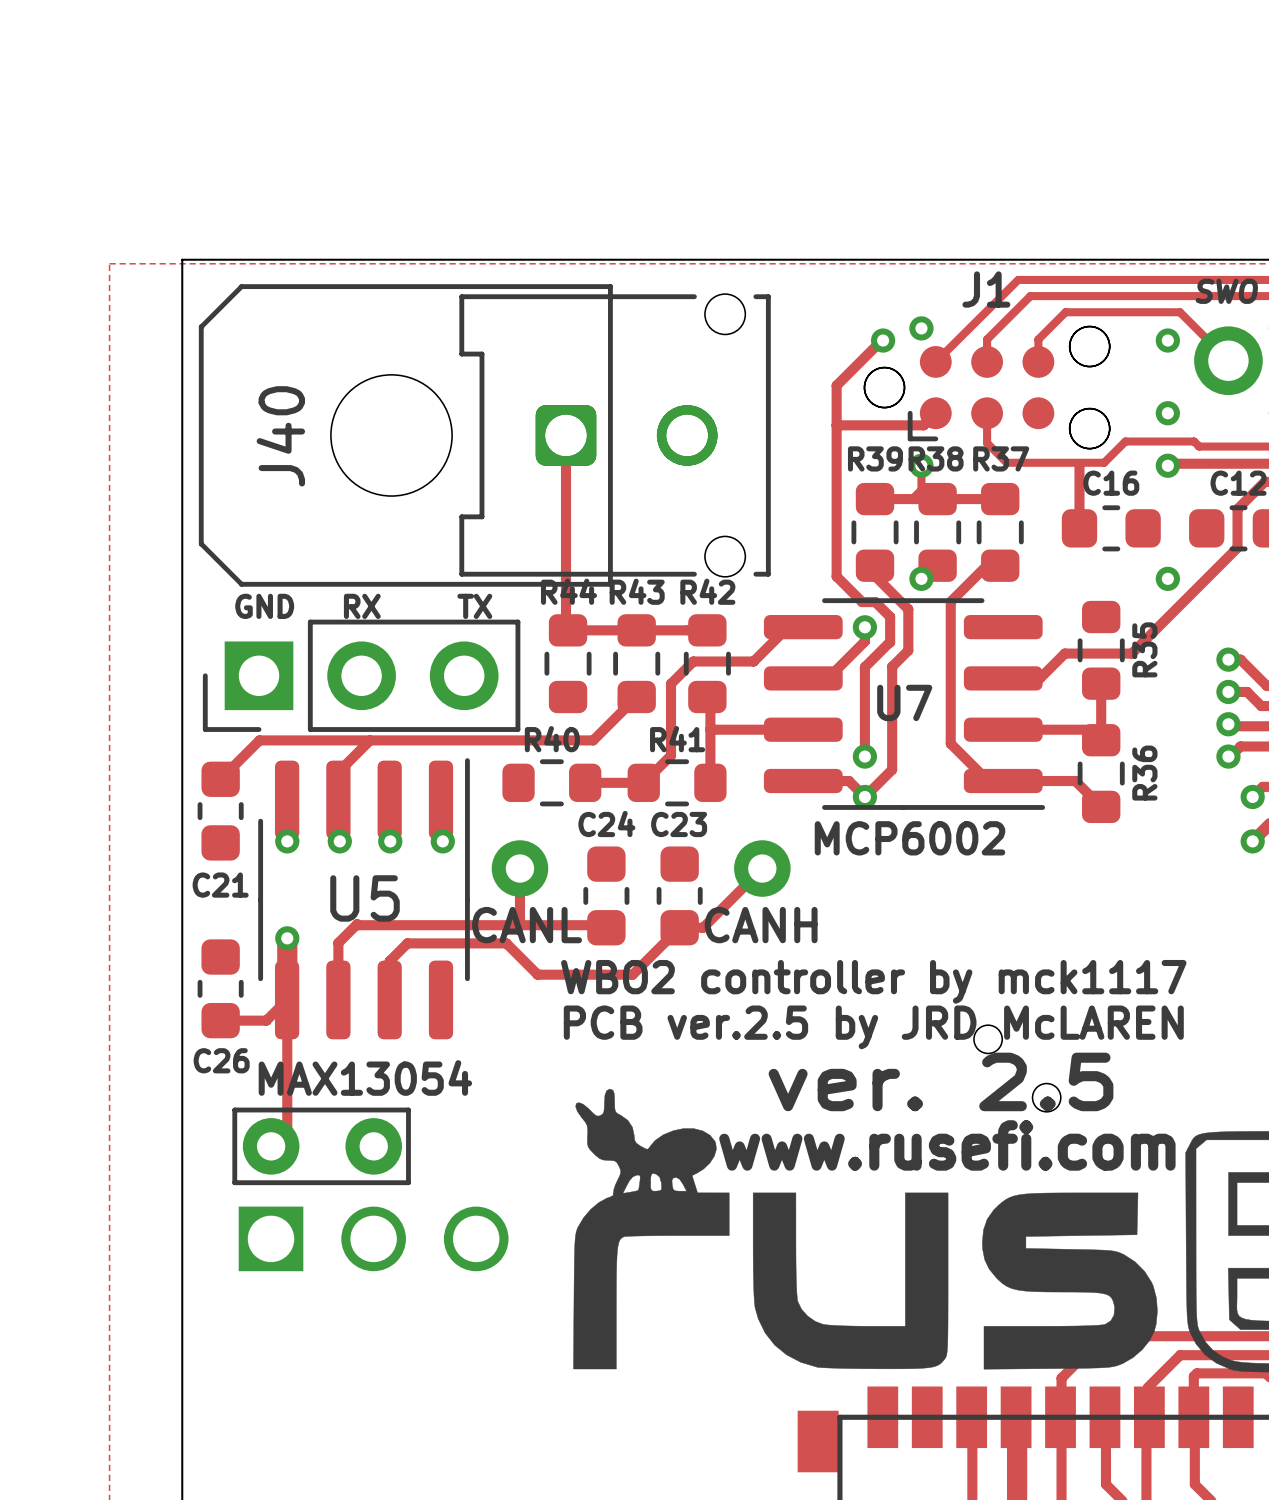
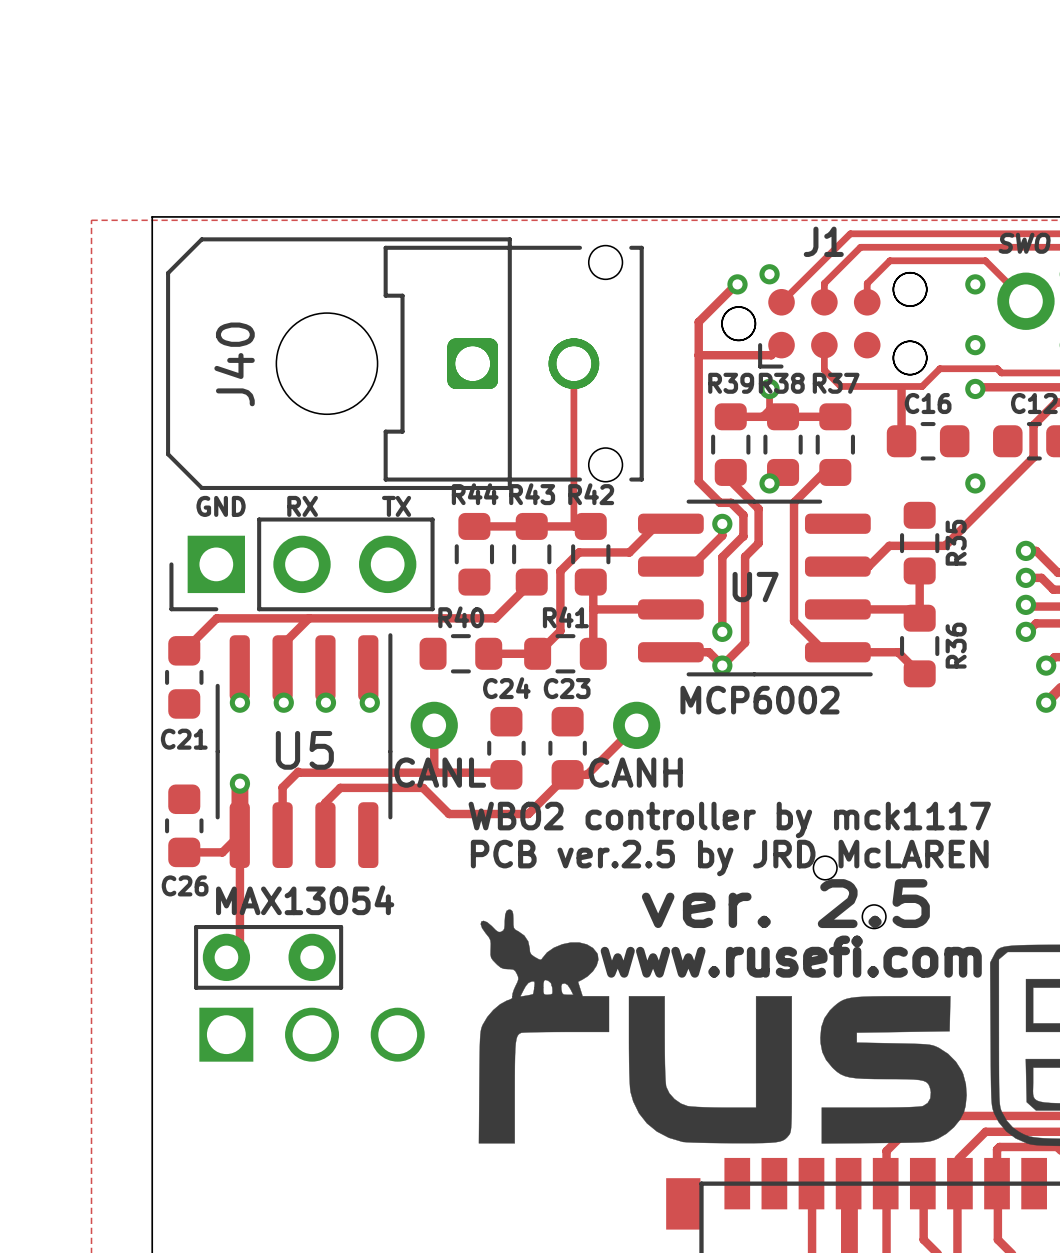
track: (566, 435) (566, 628) (568, 630) -> none
track: none -> (573, 363) (573, 525)

